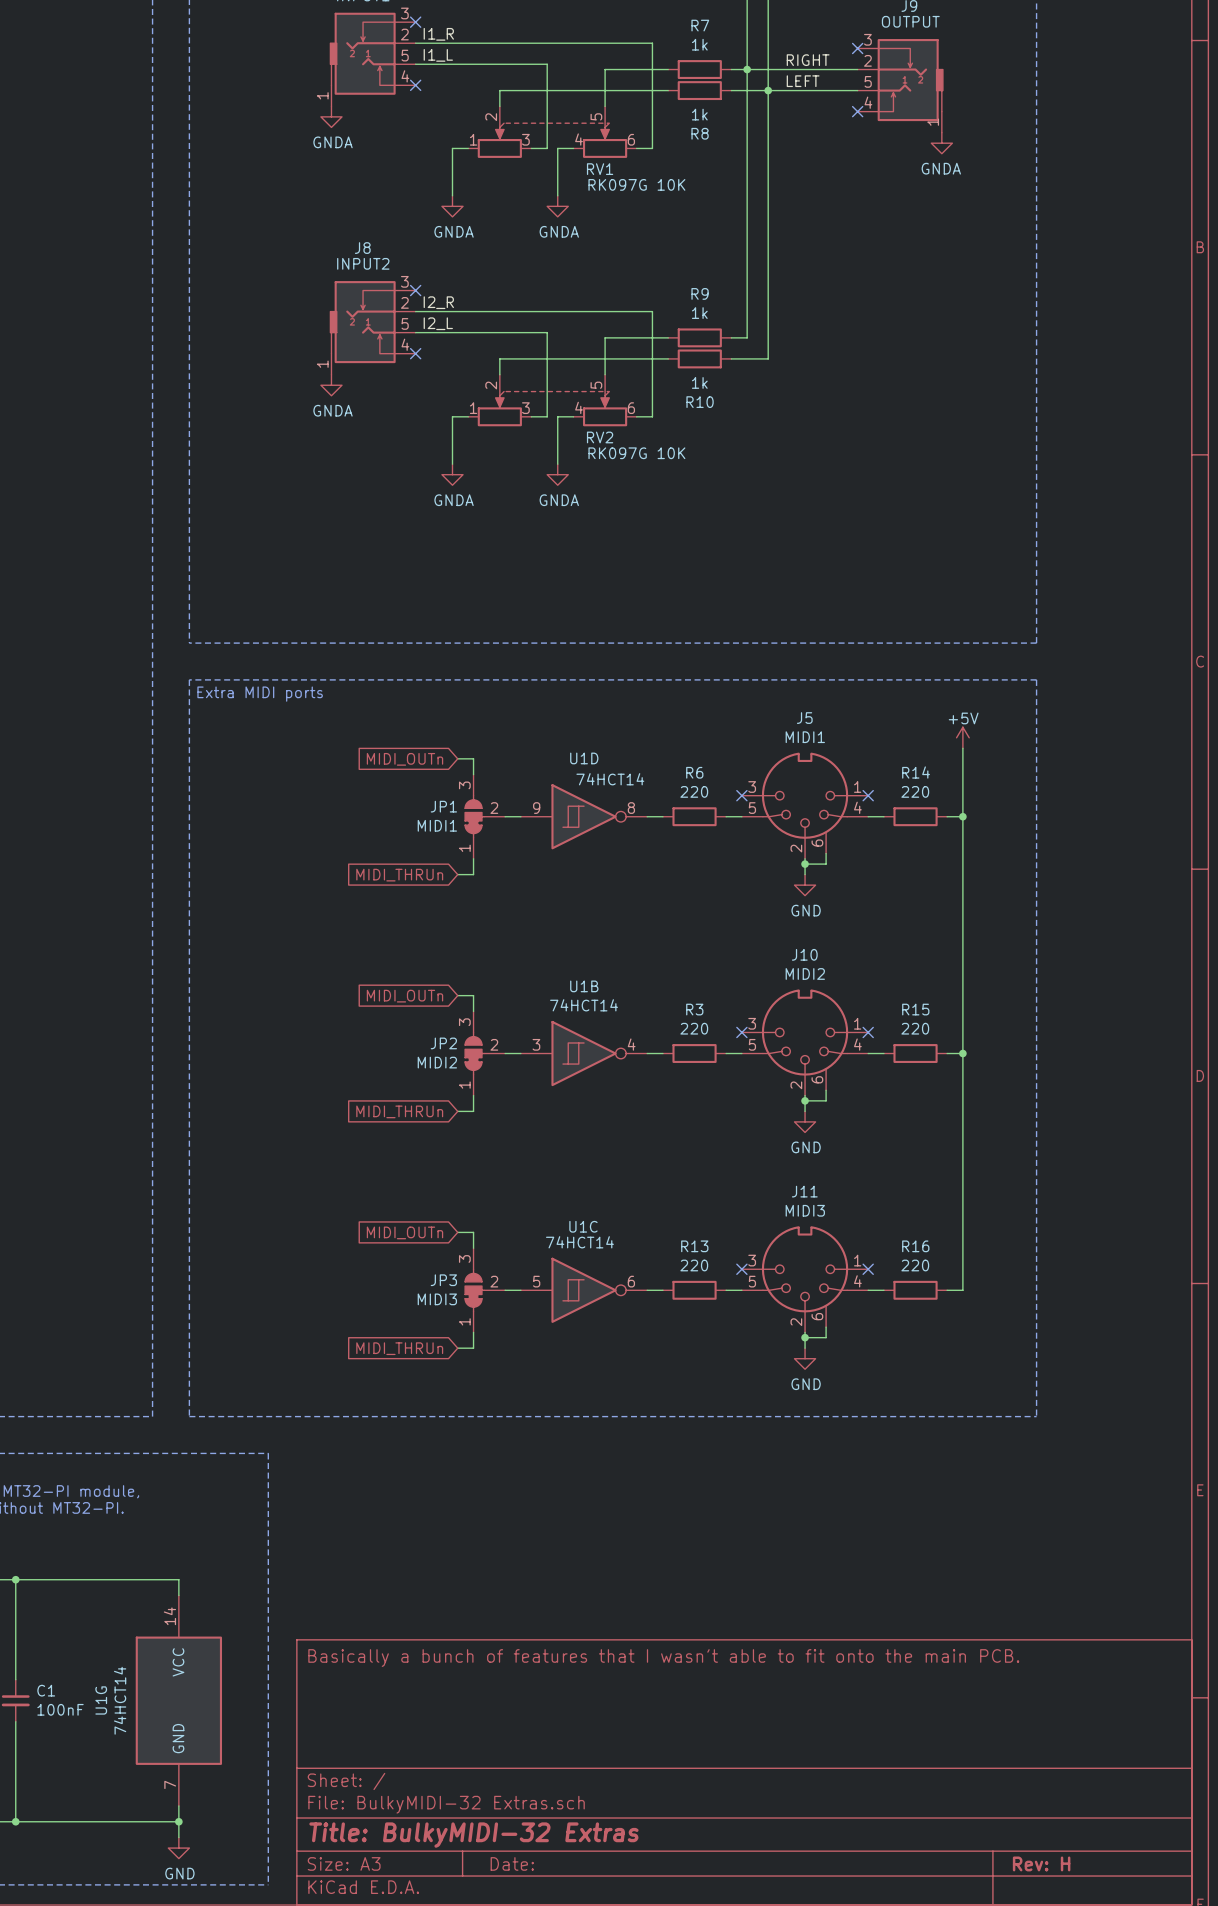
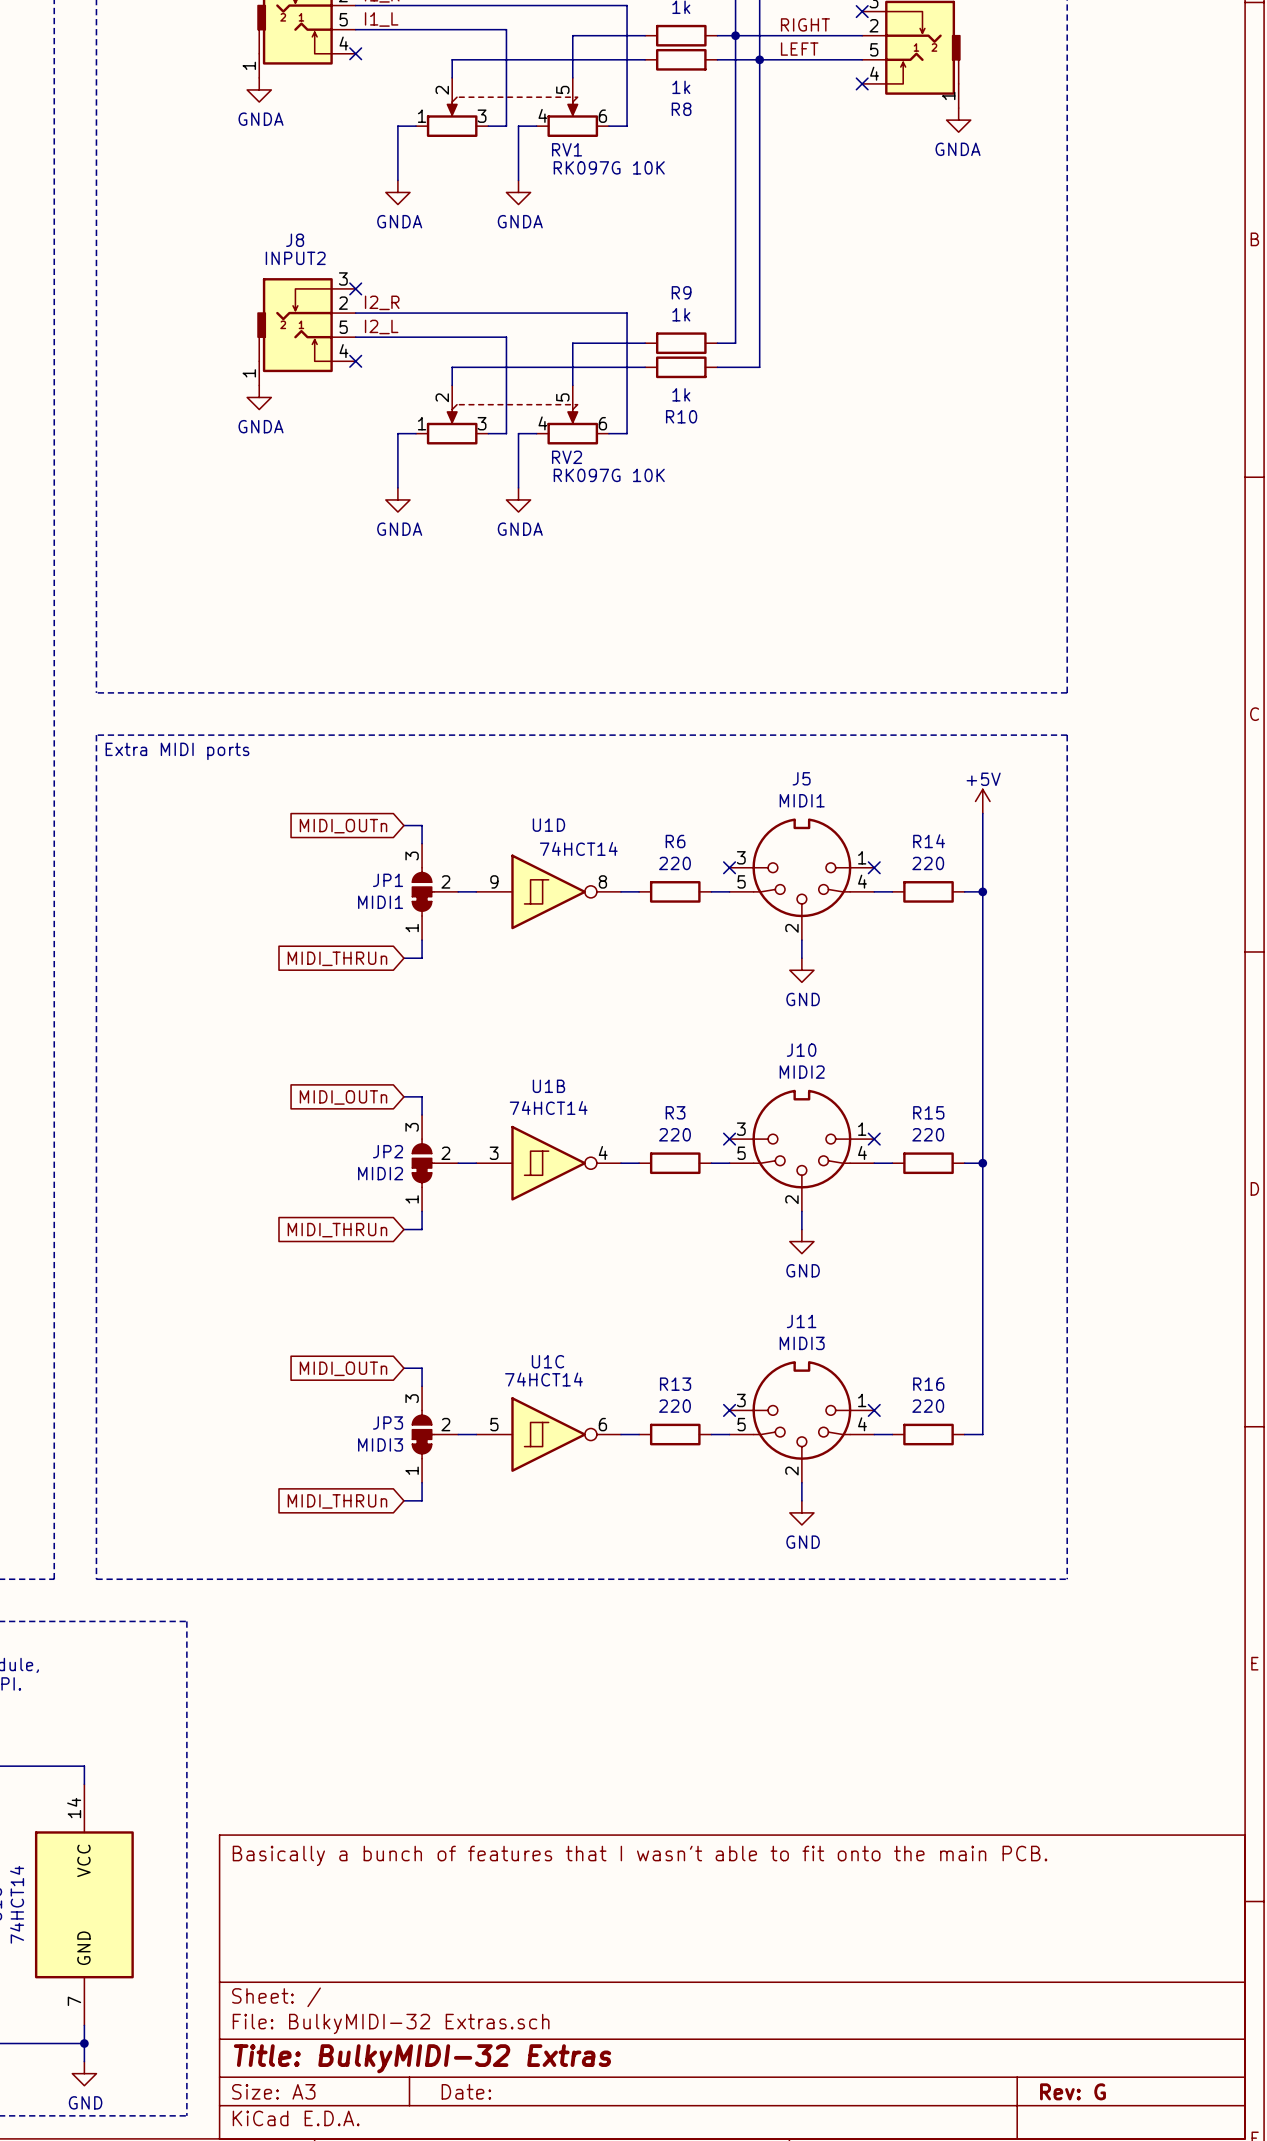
J5 symbol: [741, 752, 869, 859] -> [729, 818, 875, 941]
wire: (826, 853) (826, 864) (805, 864) -> none
junction: (805, 864) -> none
J10 symbol: [741, 989, 869, 1096] -> [729, 1089, 875, 1212]
wire: (826, 1090) (826, 1100) (805, 1100) -> none
junction: (805, 1100) -> none
J11 symbol: [741, 1226, 869, 1333] -> [729, 1361, 875, 1483]
wire: (826, 1327) (826, 1337) (805, 1337) -> none
junction: (805, 1337) -> none
title block: Rev: H (1041, 1863) -> Rev: G (1072, 2091)

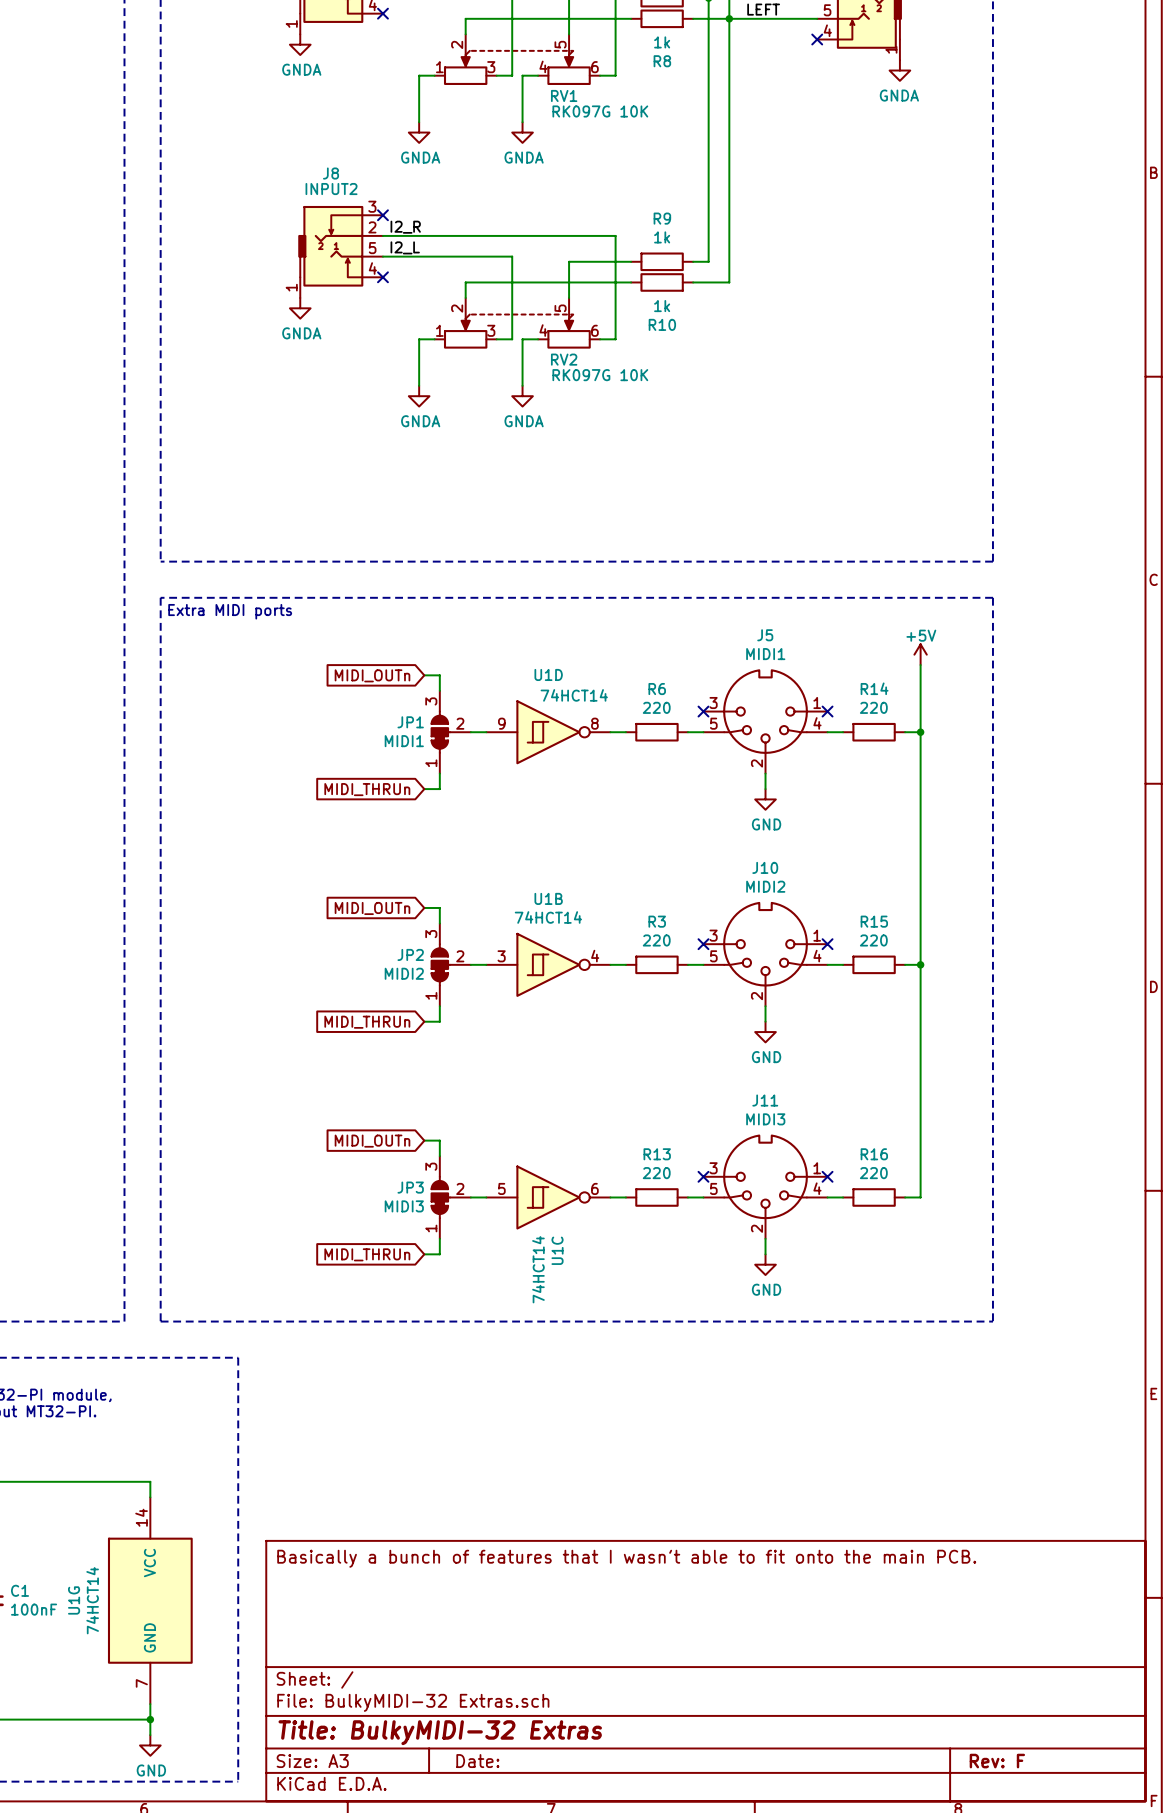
U1C name rotation: 0° (547, 1361) -> 90° counterclockwise (557, 1250)
U1C name position: U1C (547, 1361) -> U1C (557, 1250)
U1C value rotation: 0° (543, 1379) -> 90° counterclockwise (538, 1269)
U1C value position: 74HCT14 (543, 1379) -> 74HCT14 (538, 1269)
title block: Rev: G (1072, 2091) -> Rev: F (997, 1761)

